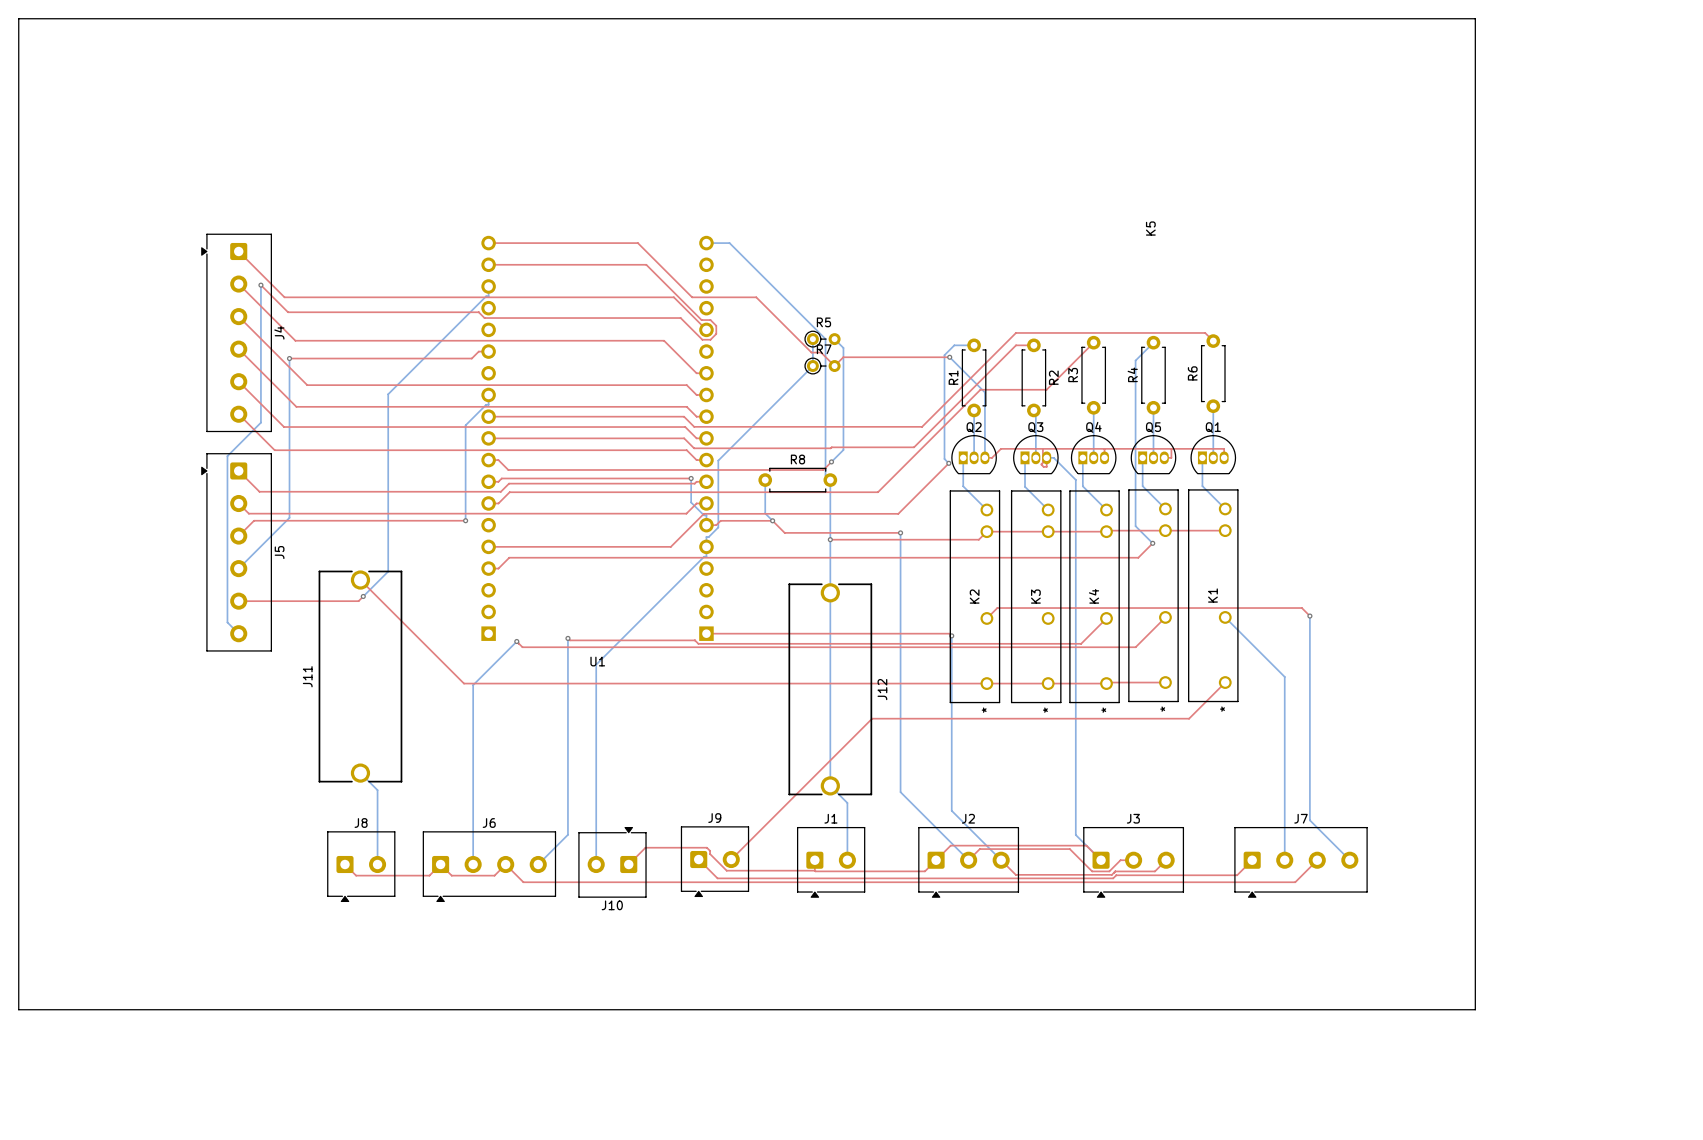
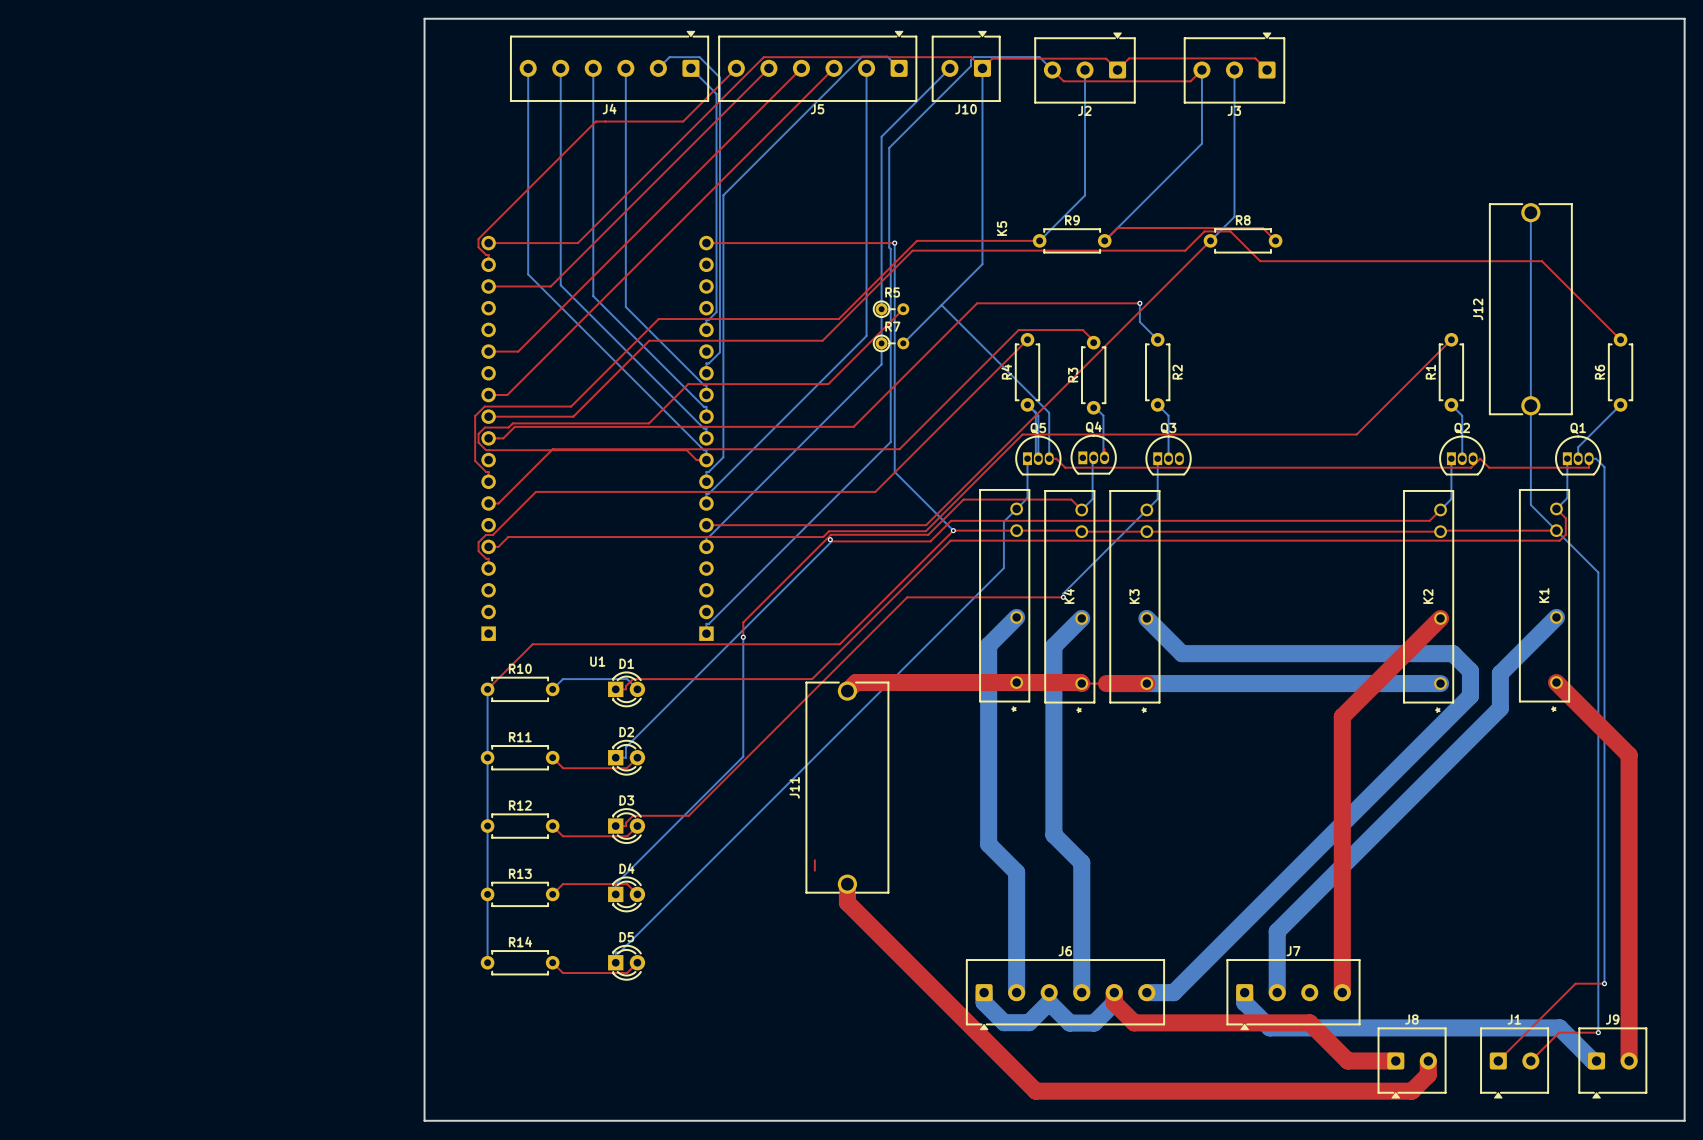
board edge: (424, 18) (18, 18) (18, 1009) (1475, 1009) (1475, 18) -> (424, 18) (424, 1120) (1684, 1120) (1684, 18) (1475, 18)
bottom track: none -> (528, 68) (528, 274) (704, 450) (706, 450) (706, 460)
bottom track: none -> (560, 68) (560, 285) (704, 428) (706, 428) (706, 438)
bottom track: none -> (593, 68) (593, 296) (704, 406) (706, 406) (706, 416)
bottom track: none -> (625, 68) (625, 306) (704, 385) (706, 385) (706, 394)
bottom track: none -> (658, 68) (669, 57) (699, 57) (719, 77) (719, 352) (708, 363) (706, 363) (706, 373)
bottom track: none -> (690, 68) (716, 93) (716, 312) (706, 320) (706, 329)
top track: none -> (768, 68) (550, 286) (488, 286)
top track: none -> (834, 68) (507, 394) (488, 394)
bottom track: none -> (866, 68) (866, 336) (708, 493) (706, 493) (706, 503)
bottom track: none -> (899, 68) (887, 56) (861, 56) (723, 195) (723, 457) (708, 471) (706, 471) (706, 481)
bottom track: none -> (982, 68) (982, 264) (903, 343)
top track: none -> (1052, 70) (1063, 81) (1190, 81) (1201, 70)
bottom track: none -> (1052, 70) (1039, 57) (974, 57) (970, 60) (970, 66) (889, 147) (890, 442) (708, 623) (706, 623) (706, 633)
bottom track: none -> (1085, 70) (1085, 195) (1039, 240)
bottom track: none -> (1201, 70) (1201, 143) (1104, 240)
bottom track: none -> (1234, 70) (1234, 216) (1210, 240)
bottom track: none -> (1530, 212) (1530, 505) (1598, 572) (1598, 1032)
R9: none -> (1072, 240)
top track: none -> (1104, 240) (1117, 228) (1262, 228) (1275, 240)
top track: (577, 243) (637, 243) (692, 297) (756, 297) (811, 352) (821, 352) (834, 366) (843, 357) (949, 357) -> (577, 243) (763, 57) (971, 57) (982, 68) (992, 58) (1106, 58) (1117, 70) (1129, 58) (1255, 58) (1267, 70)
top track: none -> (706, 243) (894, 243)
bottom track: (706, 243) (729, 243) (825, 339) (825, 475) (830, 480) (830, 785) (847, 802) (847, 860) -> none
bottom track: none -> (894, 243) (894, 472) (953, 530)
via: none -> (894, 243)
top track: (238, 251) (284, 297) (673, 297) (706, 329) -> none
top track: (488, 264) (646, 264) (701, 320) (710, 320) (716, 325) (716, 333) (710, 339) (702, 339) (680, 318) (484, 318) (478, 312) (288, 312) (260, 285) -> (488, 264) (488, 254) (478, 247) (478, 238) (595, 121) (683, 121) (736, 68)
top track: (238, 284) (295, 340) (649, 340) -> (573, 416) (649, 340)
bottom track: (260, 285) (260, 422) (227, 456) (227, 622) (238, 633) -> none
via: (260, 285) -> none
bottom track: (488, 286) (488, 296) (486, 296) (388, 394) (388, 571) (363, 596) -> none
bottom track: none -> (1139, 303) (1139, 321) (1157, 339)
via: none -> (1139, 303)
bottom track: none -> (941, 305) (1049, 412) (1049, 458)
top track: (238, 316) (307, 385) (686, 385) (696, 394) (706, 394) -> none
J4 rotation: 0° (236, 332) -> 90° clockwise (609, 66)
J4 position: (236, 332) -> (609, 66)
bottom track: (812, 339) (812, 366) (718, 460) (718, 527) (708, 537) -> (949, 68) (881, 136) (881, 364) (708, 537)
R5 position: (822, 339) -> (891, 309)
bottom track: (834, 339) (843, 347) (843, 449) (830, 462) -> none
top track: (664, 340) (696, 373) (706, 373) -> (664, 340) (822, 340) (912, 250) (1185, 250) (1204, 231) (1230, 231) (1260, 261) (1541, 261) (1620, 339)
top track: (1213, 341) (1205, 332) (1015, 332) (922, 426) (853, 426) -> (1139, 303) (977, 303) (853, 426)
top track: (1093, 342) (1046, 389) (980, 389) (877, 492) (509, 492) -> (1092, 339) (1082, 330) (1018, 330) (899, 449) (552, 449) (509, 492)
bottom track: (1153, 342) (1135, 360) (1135, 526) (1152, 543) -> none
bottom track: (974, 345) (954, 345) (944, 355) (944, 458) (948, 463) -> none
top track: (1033, 345) (1016, 345) (914, 447) (694, 448) (684, 438) (503, 438) -> none
top track: (238, 349) (296, 406) (686, 406) (696, 416) (706, 416) -> none
top track: (488, 351) (478, 351) (471, 358) (289, 358) -> (488, 351) (518, 351) (801, 68)
bottom track: (949, 357) (984, 392) (984, 457) -> none
via: (949, 357) -> none
bottom track: (289, 358) (289, 517) (238, 568) -> none
via: (289, 358) -> none
R7 position: (822, 366) -> (891, 343)
R6 position: (1213, 373) -> (1620, 372)
R4 position: (1153, 375) -> (1027, 372)
R1 position: (974, 377) -> (1451, 372)
R2 position: (1033, 377) -> (1157, 372)
top track: (238, 381) (284, 427) (685, 427) (696, 438) (706, 438) -> none
bottom track: (488, 394) (488, 404) (486, 404) (465, 425) (465, 520) -> none
bottom track: none -> (1027, 404) (1038, 415) (1038, 458)
bottom track: none -> (1092, 404) (1103, 415) (1103, 458)
bottom track: none -> (1157, 404) (1168, 415) (1168, 458)
bottom track: none -> (1451, 404) (1462, 415) (1462, 458)
bottom track: none -> (1620, 404) (1578, 447) (1578, 458)
bottom track: (1213, 406) (1213, 457) -> none
bottom track: (1093, 407) (1093, 457) -> none
bottom track: (1153, 407) (1153, 457) -> none
bottom track: (974, 410) (974, 457) -> none
top track: (238, 414) (274, 450) (486, 450) -> (903, 309) (828, 384) (688, 384) (649, 423) (512, 423) (508, 427) (484, 427) (478, 433) (478, 442) (486, 450)
top track: (573, 416) (684, 416) (694, 426) -> (503, 438) (514, 426) (694, 426)
top track: (1042, 448) (1041, 464) (1043, 466) (1046, 466) (1046, 457) -> none
top track: (1171, 448) (1171, 457) (1164, 457) -> none
Q2 position: (974, 454) -> (1462, 455)
Q3 position: (1035, 454) -> (1168, 455)
Q5 position: (1153, 454) -> (1038, 455)
Q1 position: (1213, 454) -> (1578, 455)
bottom track: (963, 457) (963, 486) (986, 509) -> none
top track: (984, 457) (992, 457) (1000, 448) (1224, 448) (1224, 457) -> none
bottom track: (1025, 457) (1025, 486) (1048, 509) -> none
bottom track: (1046, 457) (1053, 457) (1075, 479) (1075, 834) (1101, 860) -> none
bottom track: (1082, 457) (1082, 486) (1106, 509) -> none
bottom track: (1142, 457) (1142, 486) (1165, 508) -> none
bottom track: (1202, 457) (1202, 486) (1225, 508) -> none
bottom track: none -> (1027, 458) (1027, 498) (1003, 521) (1003, 568) (619, 952) (615, 952) (615, 962)
top track: none -> (1049, 458) (1056, 458) (1065, 467) (1471, 467) (1480, 458) (1489, 467) (1589, 467) (1589, 458)
bottom track: none -> (1092, 458) (1092, 499) (1081, 509)
bottom track: none -> (1157, 458) (1157, 499) (1063, 593) (1063, 597)
bottom track: none -> (1451, 458) (1451, 499) (1440, 509)
bottom track: none -> (1567, 458) (1567, 498) (1556, 508)
bottom track: none -> (1589, 458) (1596, 458) (1604, 467) (1604, 983)
top track: (488, 460) (498, 460) (508, 469) (823, 469) (831, 461) -> none
via: (831, 461) -> none
top track: (948, 463) (898, 513) (703, 513) (670, 546) (498, 546) -> (1451, 339) (1356, 434) (1022, 434) (925, 531) (829, 531) (823, 537) (508, 537) (498, 546)
via: (948, 463) -> none
top track: (238, 470) (259, 491) (500, 491) (509, 483) (694, 483) (696, 481) (706, 481) -> none
top track: (691, 478) (501, 478) (498, 481) (488, 481) -> (1039, 240) (917, 240) (838, 319) (658, 319) (571, 406) (484, 406) (475, 416) (475, 460) (486, 471) (488, 471) (488, 481)
bottom track: (691, 478) (691, 502) (704, 515) (706, 515) (706, 525) -> none
via: (691, 478) -> none
bottom track: (765, 480) (765, 513) (772, 520) -> none
R8 position: (797, 480) -> (1243, 240)
top track: (706, 503) (696, 503) (686, 513) (248, 513) (238, 503) -> none
top track: none -> (1556, 508) (1565, 518) (1565, 534) (1559, 540) (950, 540) (812, 679) (633, 679) (625, 686) (625, 689) (615, 689)
top track: none -> (1081, 509) (1071, 499) (963, 499) (928, 534) (830, 534) (743, 622) (743, 637)
top track: none -> (1440, 509) (1429, 520) (951, 520) (930, 541) (831, 541)
top track: (465, 520) (254, 520) (238, 536) -> none
via: (465, 520) -> none
via: (772, 520) -> none
top track: (716, 525) (720, 520) (772, 520) (784, 532) (900, 532) -> (716, 525) (926, 525) (1210, 240)
via: none -> (953, 530)
top track: (1225, 530) (1106, 531) -> (1556, 530) (1106, 531)
top track: (1081, 531) (986, 531) (978, 539) (830, 539) -> (1081, 531) (953, 530) (839, 644) (532, 644) (487, 689)
bottom track: (900, 532) (900, 792) (968, 860) -> none
via: (900, 532) -> none
bottom track: none -> (831, 541) (625, 747) (625, 757) (615, 757)
top track: (1152, 543) (1138, 557) (509, 557) (498, 568) (488, 568) -> (1027, 339) (875, 491) (535, 491) (492, 535) (485, 535) (478, 542) (478, 551) (488, 558) (488, 568)
via: (1152, 543) -> none
bottom track: (706, 546) (706, 556) (704, 556) (596, 664) (596, 864) -> none
J5 rotation: 0° (236, 552) -> 90° clockwise (817, 66)
J5 position: (236, 552) -> (817, 66)
top track: (360, 580) (464, 683) (1081, 683) -> (847, 691) (855, 682) (1081, 683)
K5 position: (1153, 595) -> (1004, 595)
K1 position: (1213, 595) -> (1544, 595)
top track: (363, 596) (358, 601) (238, 601) -> none
via: (363, 596) -> none
K2 position: (974, 596) -> (1428, 596)
K3 position: (1036, 596) -> (1134, 596)
K4 position: (1094, 596) -> (1069, 596)
top track: none -> (1063, 597) (907, 597) (688, 815) (633, 815) (625, 822) (625, 826) (615, 826)
via: none -> (1063, 597)
top track: (1309, 616) (1301, 608) (997, 608) (986, 618) -> none
bottom track: (1309, 616) (1309, 820) (1349, 860) -> none
via: (1309, 616) -> none
bottom track: none -> (1016, 617) (988, 645) (988, 844) (1016, 872) (1016, 992)
top track: (1165, 617) (1135, 647) (522, 647) (516, 641) -> none
bottom track: (1225, 617) (1284, 676) (1284, 860) -> none
bottom track: none -> (1556, 617) (1500, 673) (1500, 708) (1277, 931) (1277, 992)
bottom track: none -> (1081, 618) (1053, 646) (1053, 834) (1081, 862) (1081, 992)
top track: (1106, 618) (1081, 643) (698, 643) (695, 640) (569, 640) (567, 638) -> none
bottom track: none -> (1146, 618) (1182, 653) (1452, 653) (1470, 671) (1470, 695) (1173, 992) (1146, 992)
top track: none -> (1440, 618) (1342, 716) (1342, 992)
top track: (706, 633) (949, 633) (951, 635) -> none
bottom track: (951, 635) (951, 810) (1001, 860) -> none
via: (951, 635) -> none
bottom track: none -> (743, 637) (743, 756) (615, 884) (615, 894)
via: none -> (743, 637)
bottom track: (567, 638) (567, 834) (538, 864) -> none
via: (567, 638) -> none
bottom track: (516, 641) (473, 685) (473, 864) -> none
via: (516, 641) -> none
J11 position: (360, 676) -> (847, 787)
top track: (1165, 682) (1106, 683) -> (1146, 683) (1106, 683)
top track: (1225, 682) (1189, 718) (872, 718) (731, 859) -> none
top track: none -> (1556, 682) (1629, 755) (1629, 1060)
bottom track: none -> (1146, 683) (1440, 683)
bottom track: none -> (487, 689) (487, 962)
R10: none -> (520, 689)
bottom track: none -> (552, 689) (562, 679) (627, 679) (637, 689)
D1: none -> (626, 689)
J12 position: (830, 689) -> (1530, 309)
J12 name position: J12 (882, 689) -> J12 (1478, 309)
R11: none -> (520, 757)
top track: none -> (552, 757) (563, 768) (626, 768) (637, 757)
D2: none -> (626, 757)
bottom track: (360, 773) (377, 790) (377, 864) -> none
R12: none -> (520, 826)
top track: none -> (552, 826) (562, 836) (627, 836) (637, 826)
D3: none -> (626, 826)
J6 footprint: [422, 831, 557, 903] -> [966, 959, 1165, 1031]
top track: (698, 859) (717, 878) (1113, 878) (1116, 875) (1237, 875) (1252, 860) -> none
top track: (968, 860) (979, 849) (1069, 849) (1092, 871) (1109, 871) (1120, 860) (1133, 860) -> none
top track: (1001, 860) (1015, 874) (1111, 874) (1115, 871) (1154, 871) (1166, 860) -> none
top track: (1101, 860) (1086, 845) (950, 845) (924, 871) (726, 870) (710, 854) (706, 847) (645, 847) (628, 864) -> none
top track: (1317, 860) (1295, 882) (523, 882) (505, 864) (494, 875) (451, 875) (440, 864) (429, 875) (356, 875) (345, 864) -> none
J9 position: (715, 861) -> (1612, 1063)
J10 position: (612, 862) -> (966, 66)
J1 position: (831, 862) -> (1514, 1063)
J2 rotation: 0° (968, 862) -> 180° (1085, 67)
J2 position: (968, 862) -> (1085, 67)
J3 rotation: 0° (1133, 862) -> 180° (1234, 67)
J3 position: (1133, 862) -> (1234, 67)
J7 position: (1301, 862) -> (1293, 994)
J8 position: (361, 866) -> (1412, 1063)
top track: none -> (847, 884) (847, 902) (1035, 1091) (1411, 1091) (1428, 1074) (1428, 1060)
R13: none -> (520, 894)
top track: none -> (552, 894) (562, 884) (627, 884) (637, 894)
D4: none -> (626, 894)
R14: none -> (520, 962)
top track: none -> (552, 962) (562, 973) (627, 973) (637, 962)
D5: none -> (626, 962)
top track: none -> (1604, 983) (1575, 983) (1498, 1060)
via: none -> (1604, 983)
bottom track: none -> (984, 992) (984, 1002) (1004, 1022) (1029, 1022) (1049, 1002) (1069, 1023) (1094, 1023) (1114, 1002) (1114, 992)
top track: none -> (1114, 992) (1114, 1002) (1134, 1022) (1309, 1022) (1347, 1060) (1395, 1060)
bottom track: none -> (1244, 992) (1244, 1002) (1269, 1027) (1559, 1027) (1592, 1060) (1596, 1060)
top track: none -> (1598, 1032) (1559, 1032) (1530, 1060)
via: none -> (1598, 1032)

